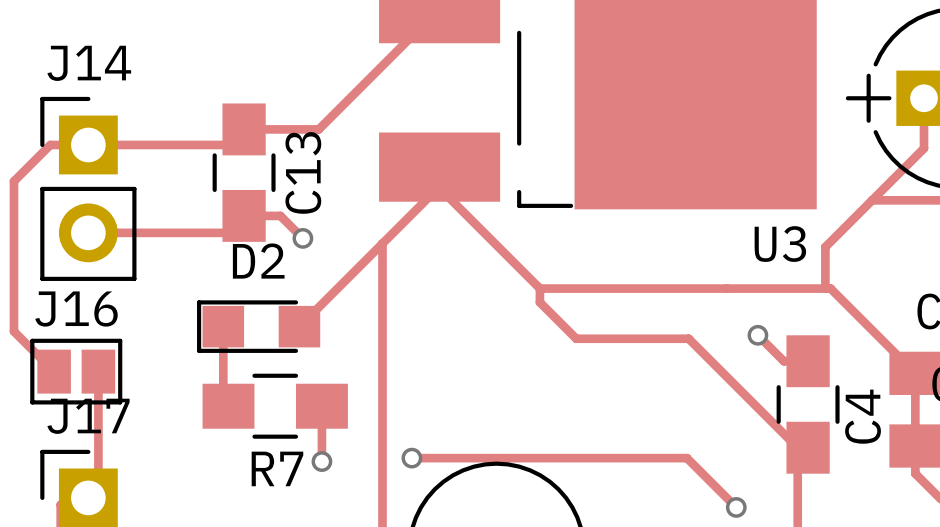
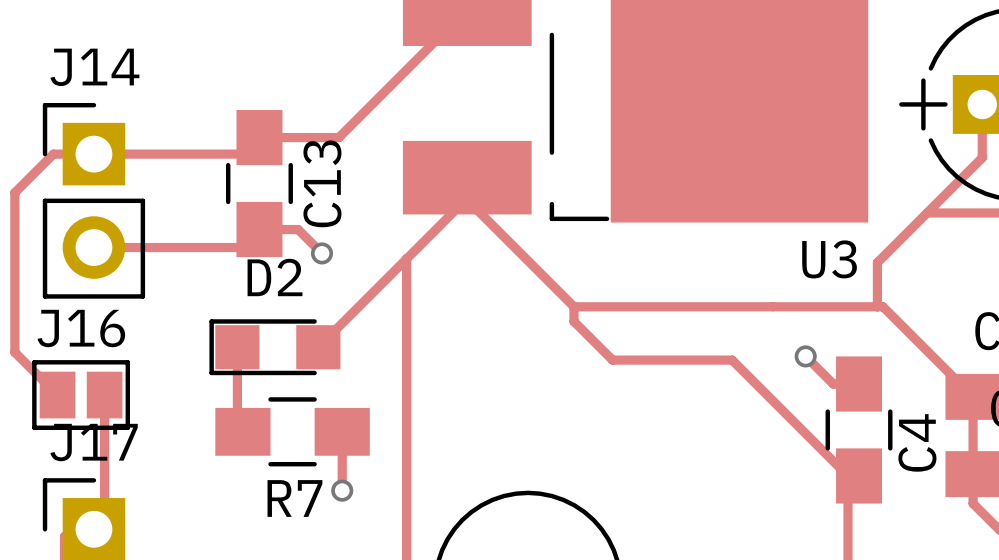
track: (411, 458) (686, 458) (736, 507) -> none
via: (411, 458) -> none
via: (736, 507) -> none

